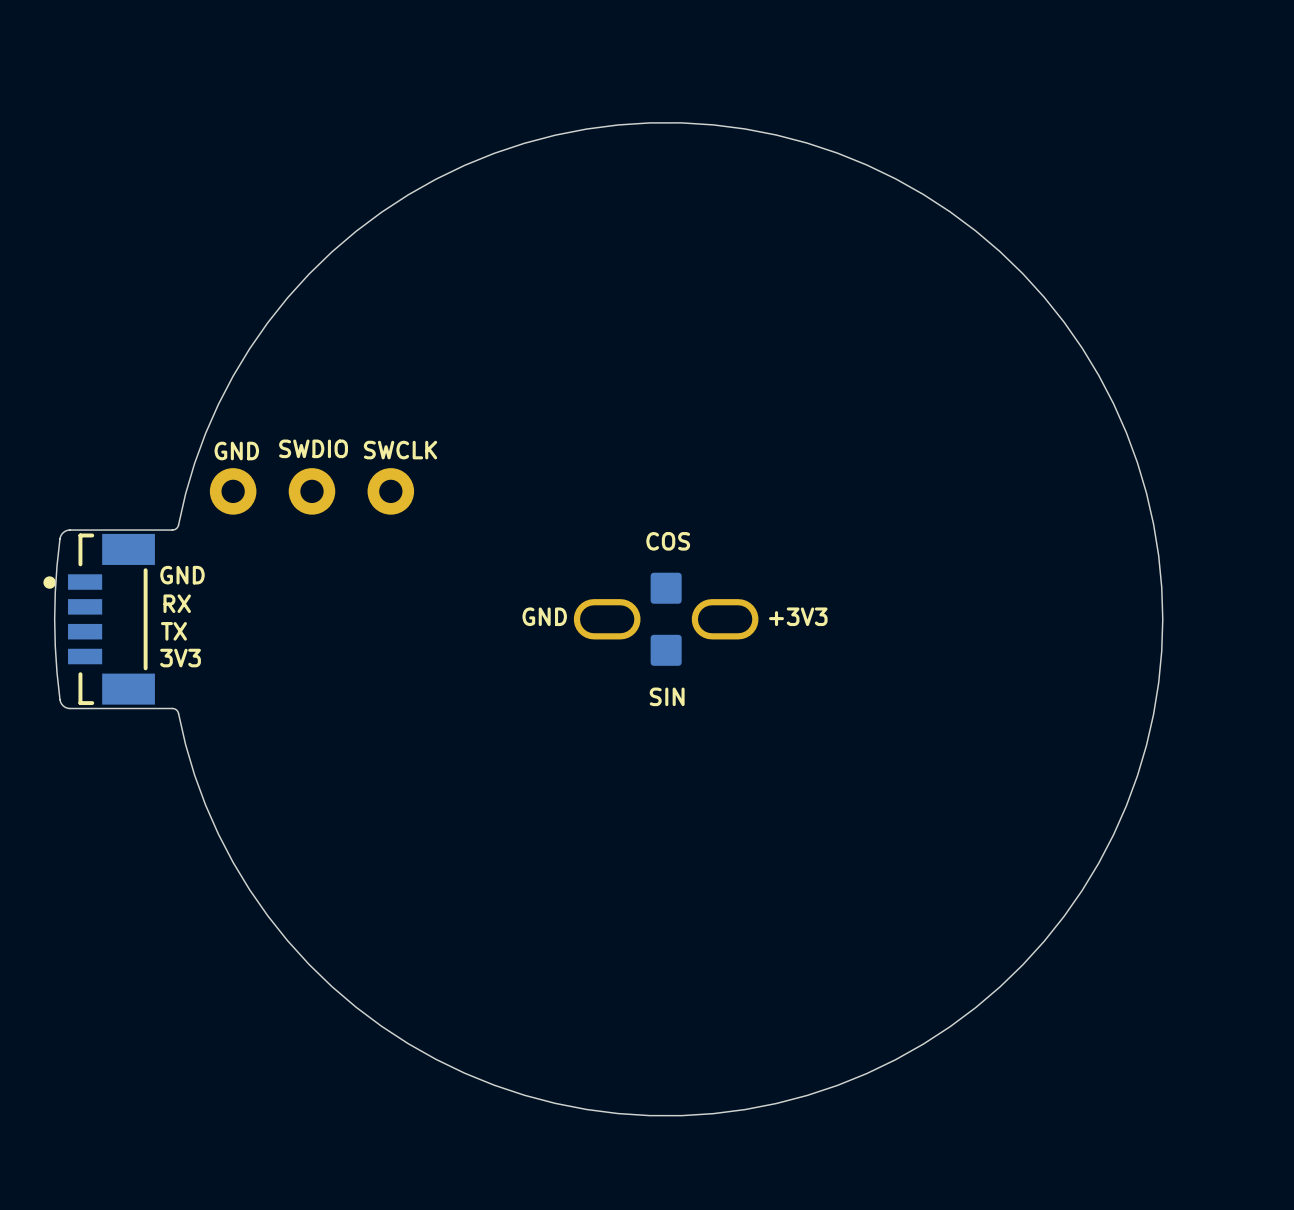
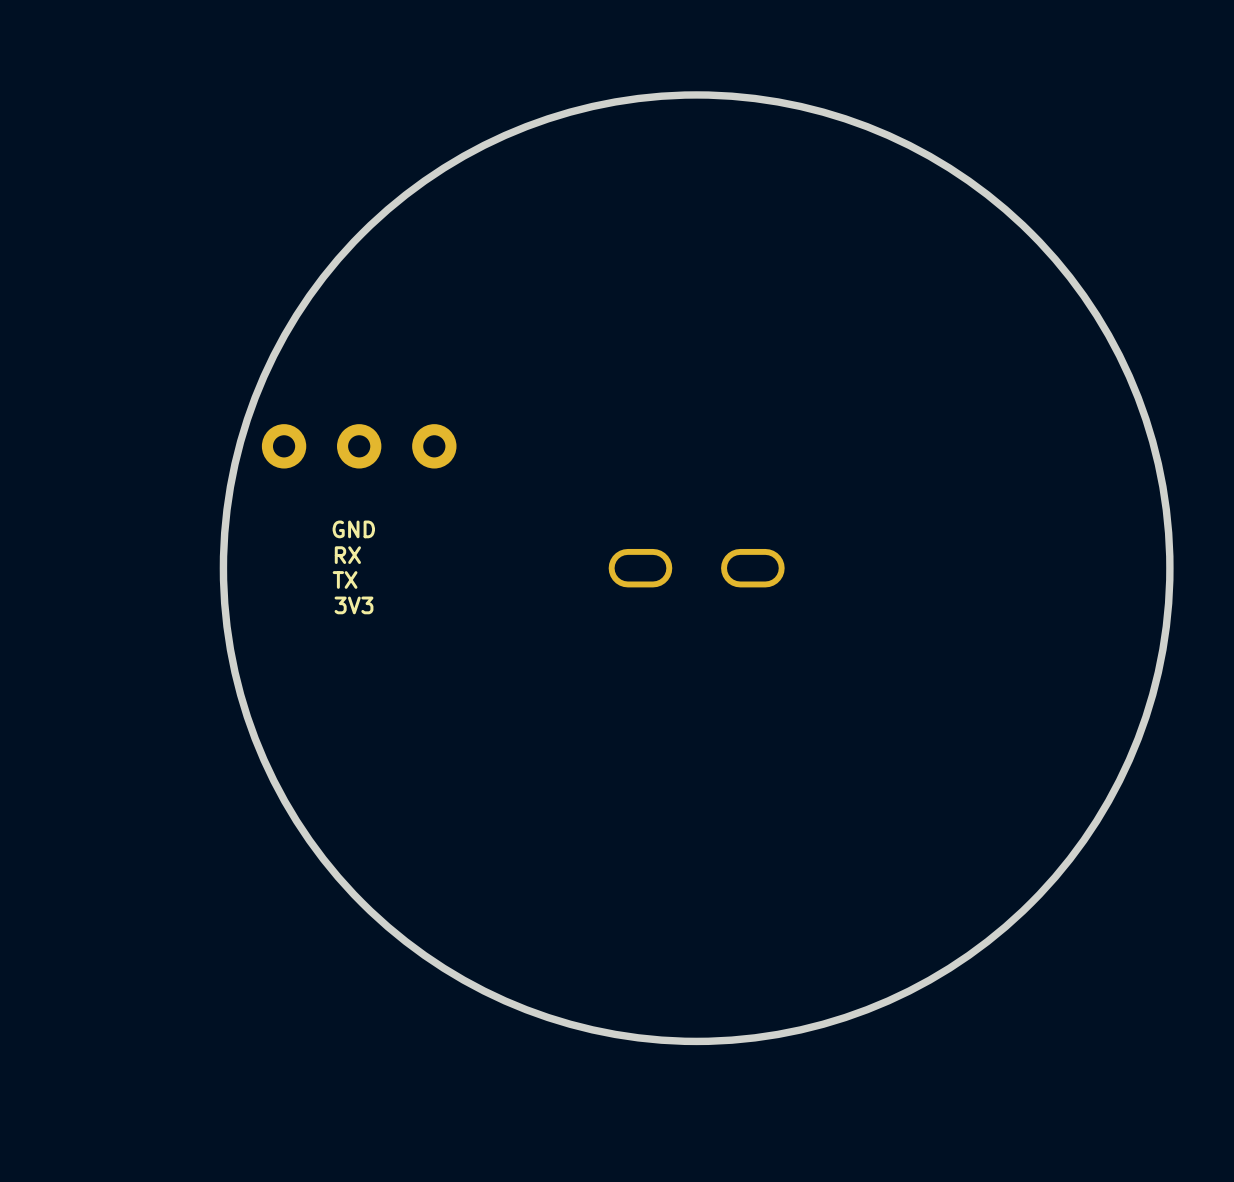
round board edge: none -> [219, 91, 1174, 1046]
text: SWDIO (313, 448) -> none
text: SWCLK (400, 450) -> none
text: GND (236, 451) -> none
board edge: (178, 525) (185, 493) (205, 433) (218, 404) (249, 348) (287, 297) (309, 274) (356, 231) (381, 212) (436, 179) (464, 165) (524, 143) (555, 135) (586, 129) (649, 122) (681, 122) (745, 128) (776, 135) (837, 153) (895, 178) (950, 211) (975, 230) (1022, 273) (1044, 297) (1082, 348) (1098, 375) (1126, 432) (1137, 462) (1153, 524) (1161, 587) (1162, 619) (1161, 651) (1153, 714) (1146, 745) (1126, 805) (1113, 834) (1082, 890) (1064, 916) (1022, 964) (975, 1007) (950, 1026) (923, 1044) (866, 1073) (837, 1085) (776, 1103) (745, 1109) (681, 1115) (618, 1113) (586, 1109) (524, 1095) (494, 1085) (436, 1059) (381, 1026) (331, 986) (309, 964) (267, 915) (233, 862) (205, 805) (194, 775) (176, 709) (70, 708) (61, 704) (57, 672) (54, 619) (57, 565) (61, 534) (70, 530) (173, 529) (178, 525) -> none
text: COS (668, 541) -> none
text: GND (182, 575) -> none
text: none -> GND (353, 529)
part: (666, 588) -> none
text position: RX (177, 603) -> RX (347, 555)
text: GND (544, 616) -> none
text: +3V3 (798, 616) -> none
part: (99, 619) -> none
text position: TX (173, 631) -> TX (345, 579)
part: (666, 650) -> none
text position: 3V3 (180, 658) -> 3V3 (354, 605)
text: SIN (667, 696) -> none

